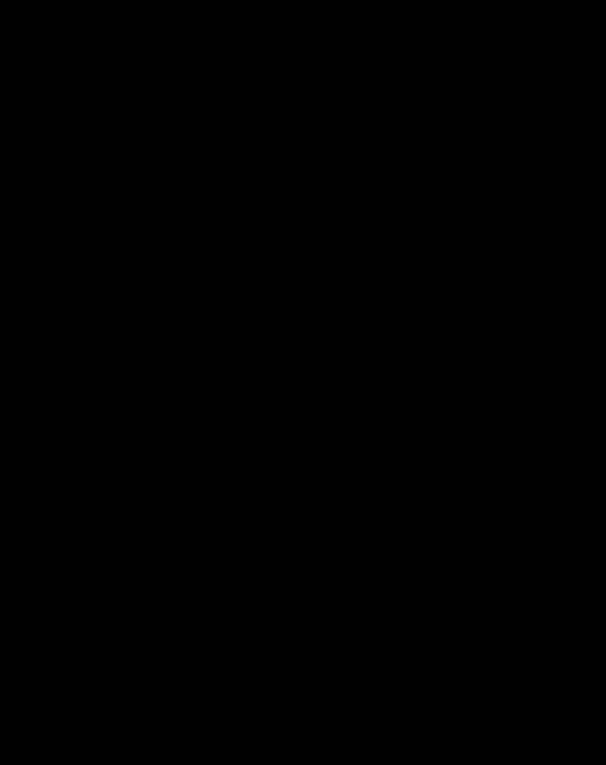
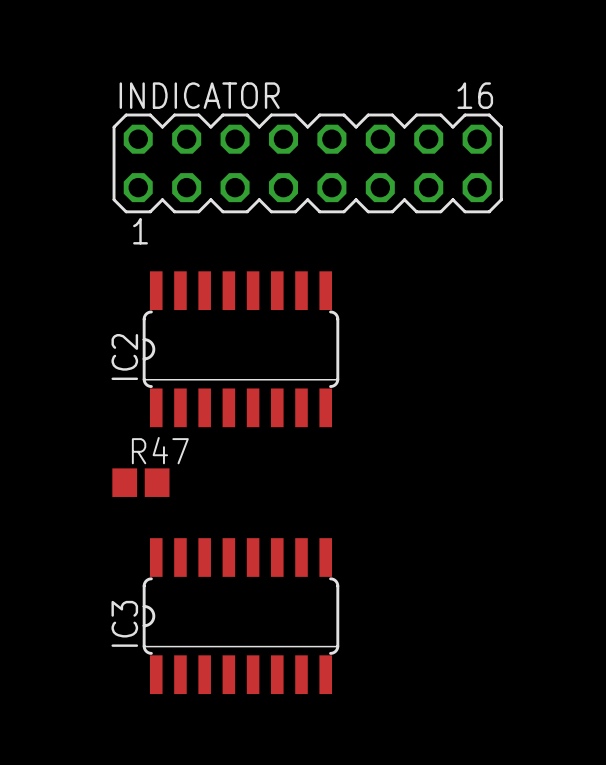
INDICATOR: none -> (307, 163)
IC2: none -> (240, 349)
R47: none -> (140, 482)
IC3: none -> (240, 616)

